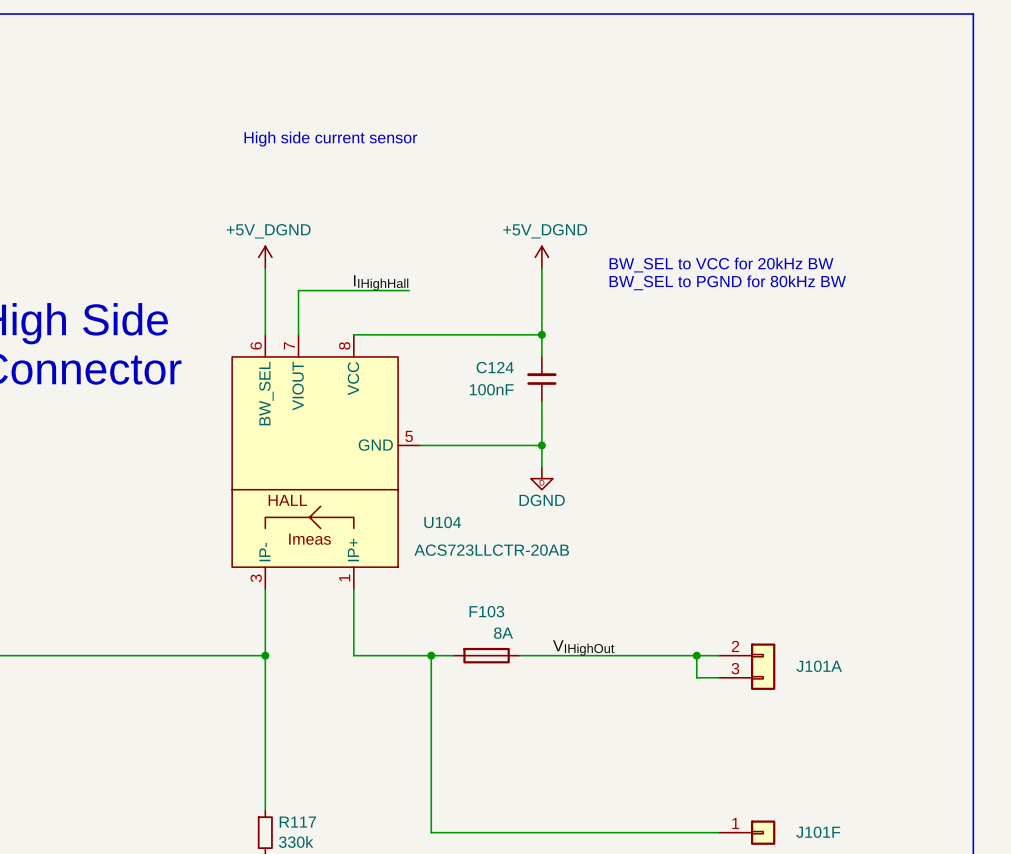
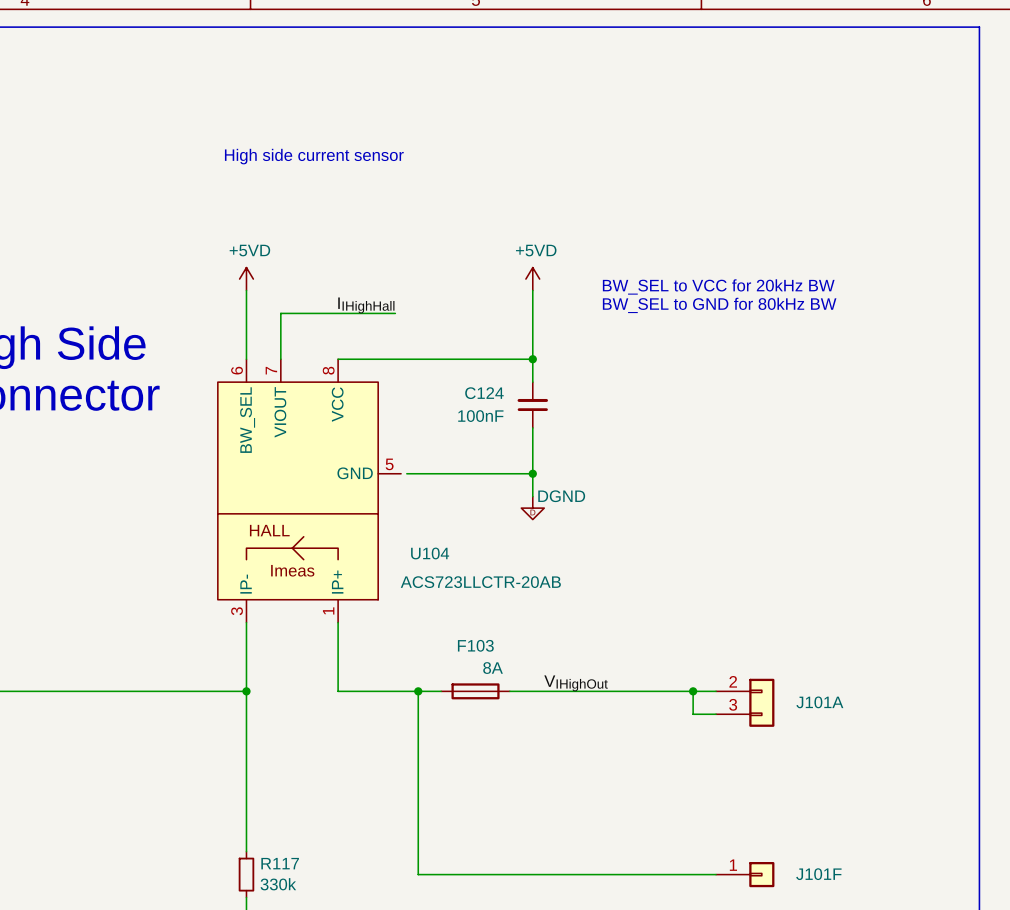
power symbol: +5V_DGND (265, 257) -> +5VD (246, 279)
power symbol: +5V_DGND (541, 257) -> +5VD (532, 279)
text: BW_SEL to PGND for 80kHz BW (727, 282) -> BW_SEL to GND for 80kHz BW (719, 305)
U104 symbol: [232, 334, 421, 590] -> [217, 359, 402, 623]
power symbol text position: DGND (542, 500) -> DGND (561, 496)

